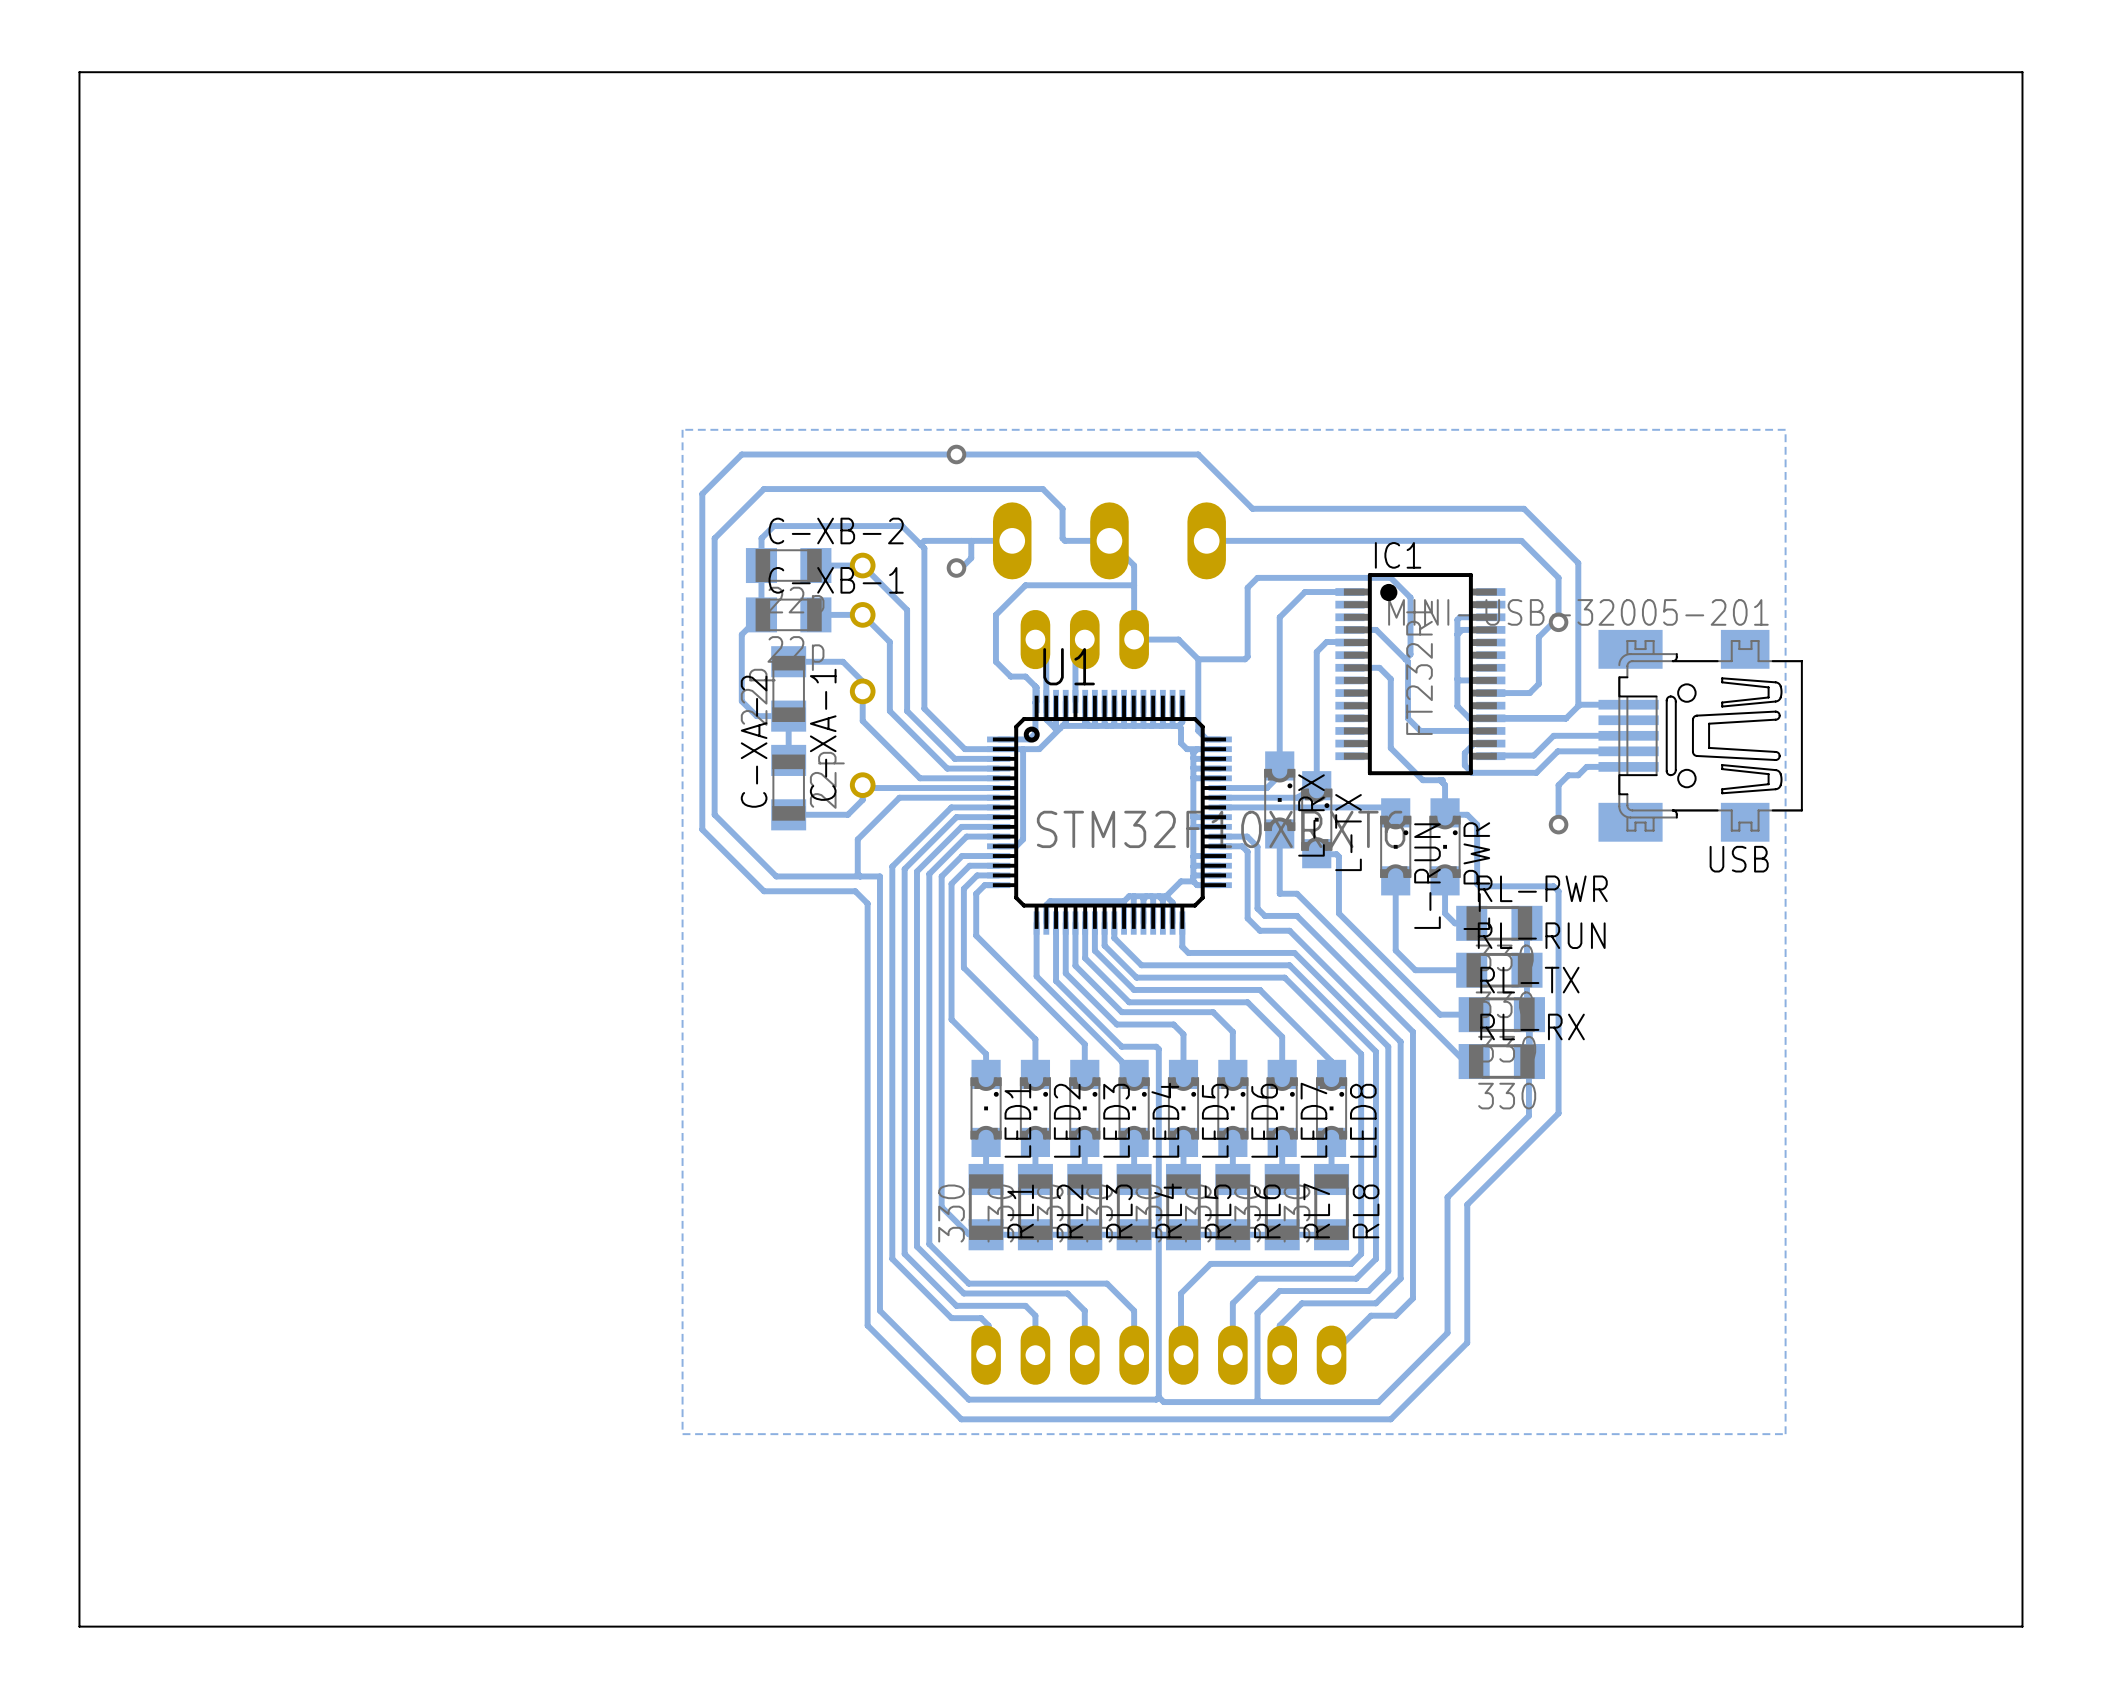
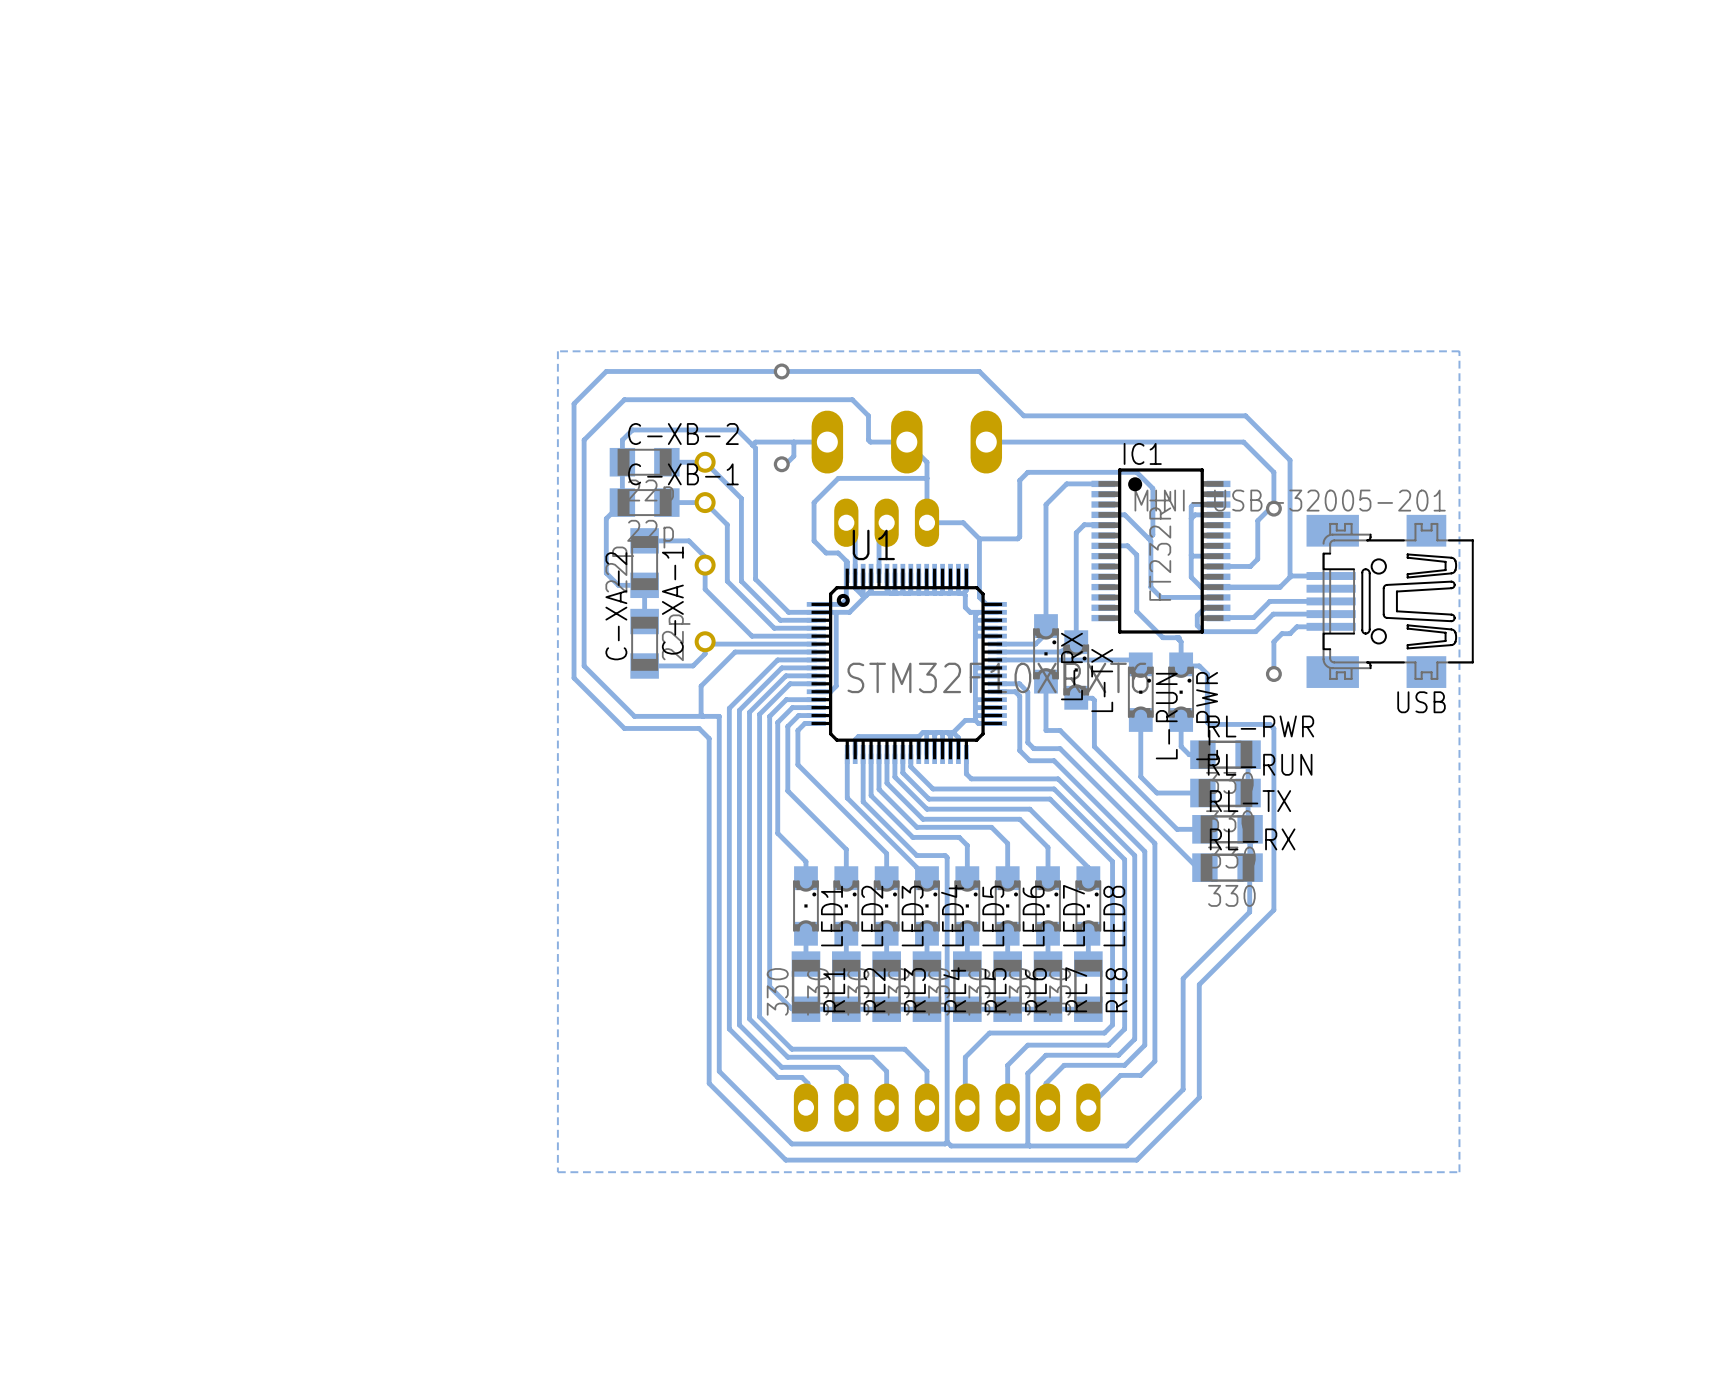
board edge: (2022, 72) (79, 72) (79, 1626) (2022, 1626) (2022, 72) -> none

